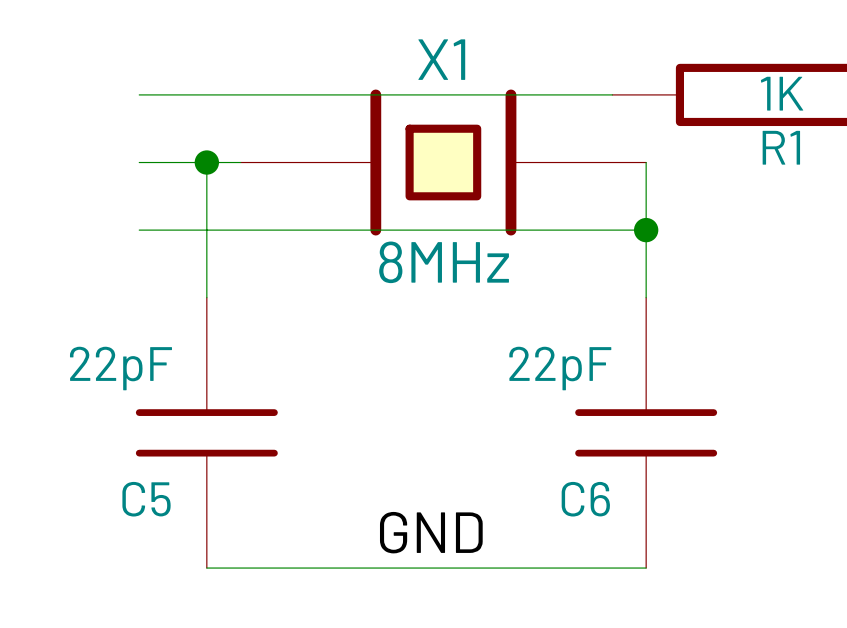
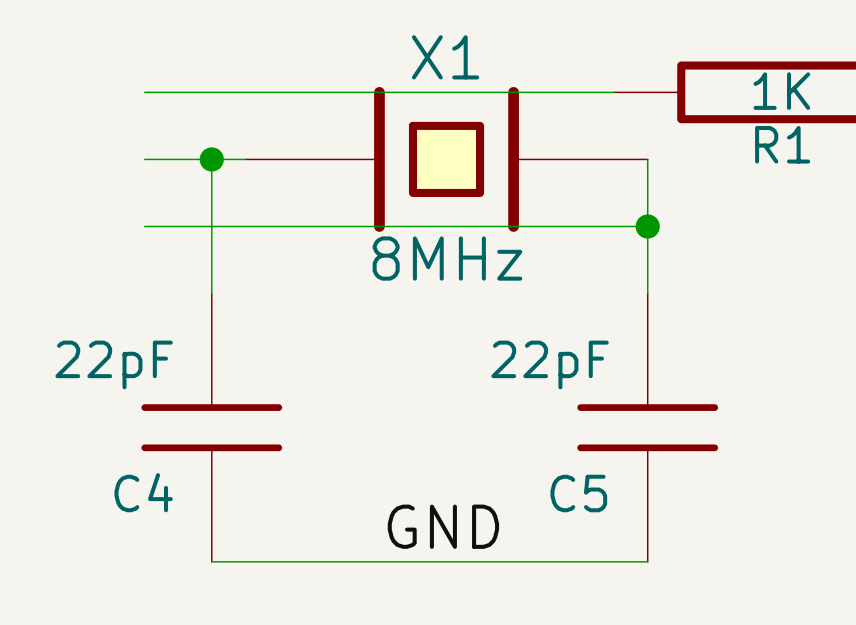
C5 name: C5 (146, 499) -> C4 (143, 492)
C6 name: C6 (585, 499) -> C5 (578, 493)

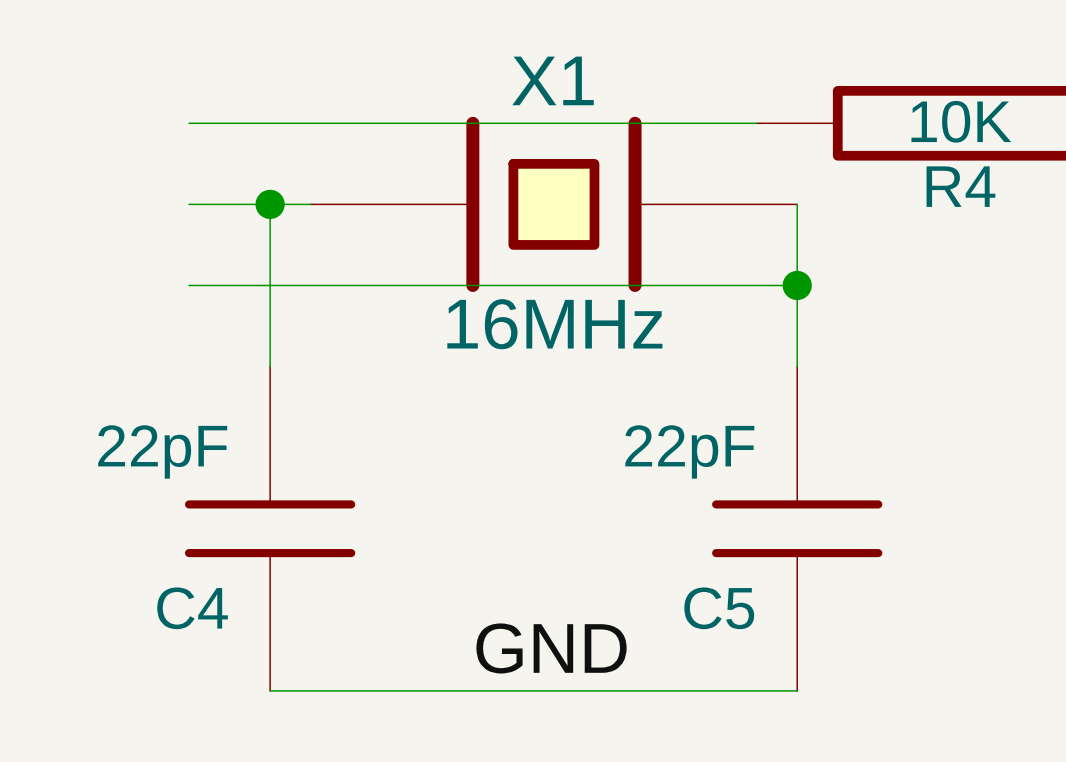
R1 value: 1K (781, 91) -> 10K (961, 121)
R1 name: R1 (782, 144) -> R4 (960, 186)
X1 value: 8MHz (447, 258) -> 16MHz (554, 324)

